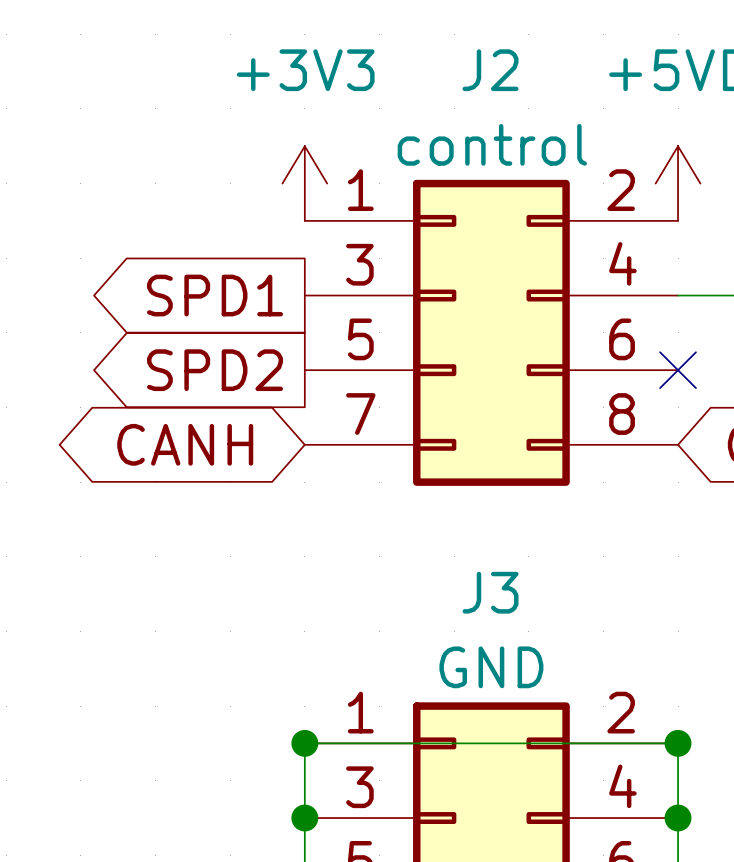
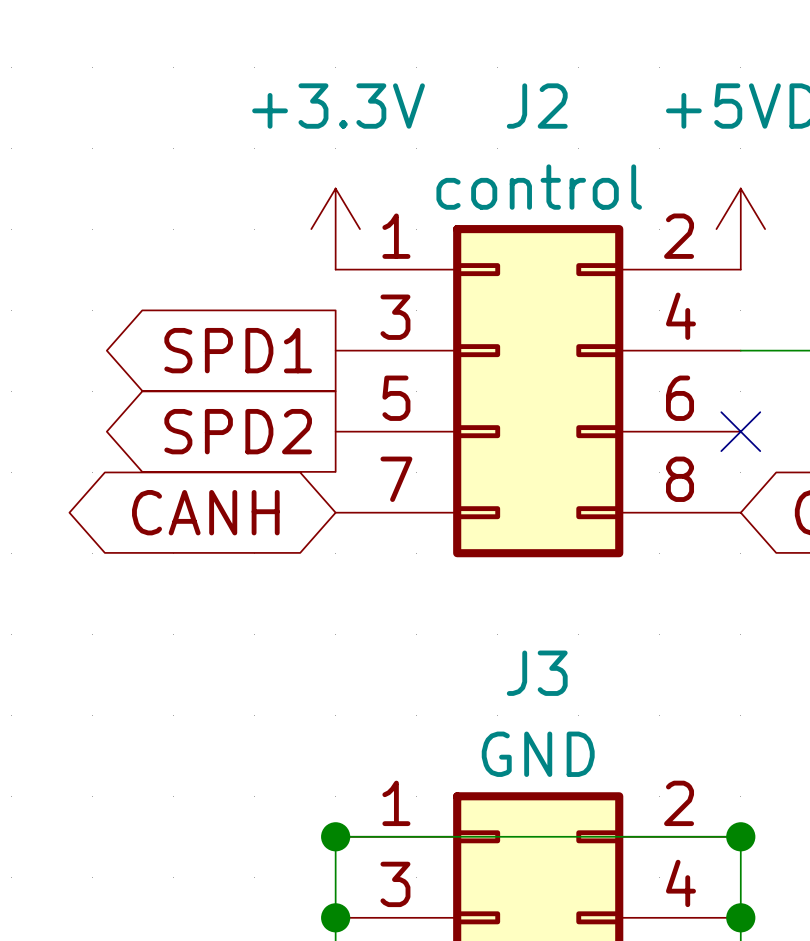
power symbol: +3V3 (304, 183) -> +3.3V (335, 229)

